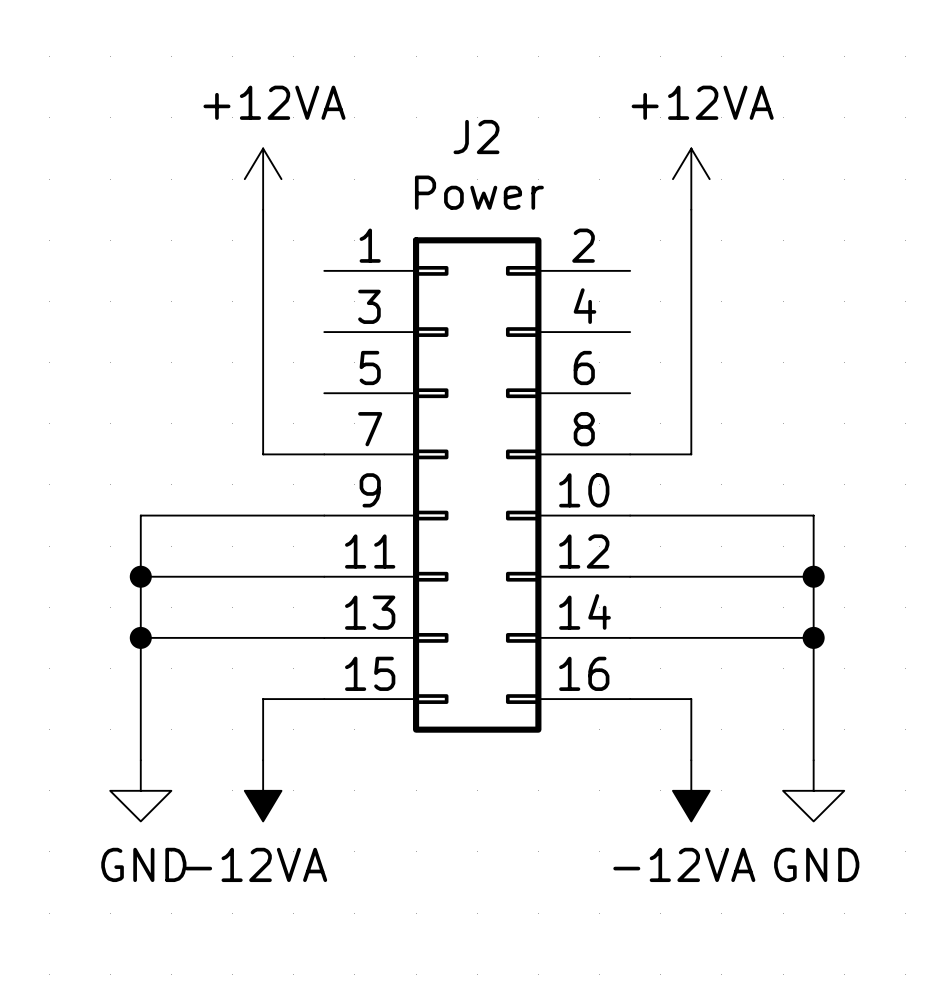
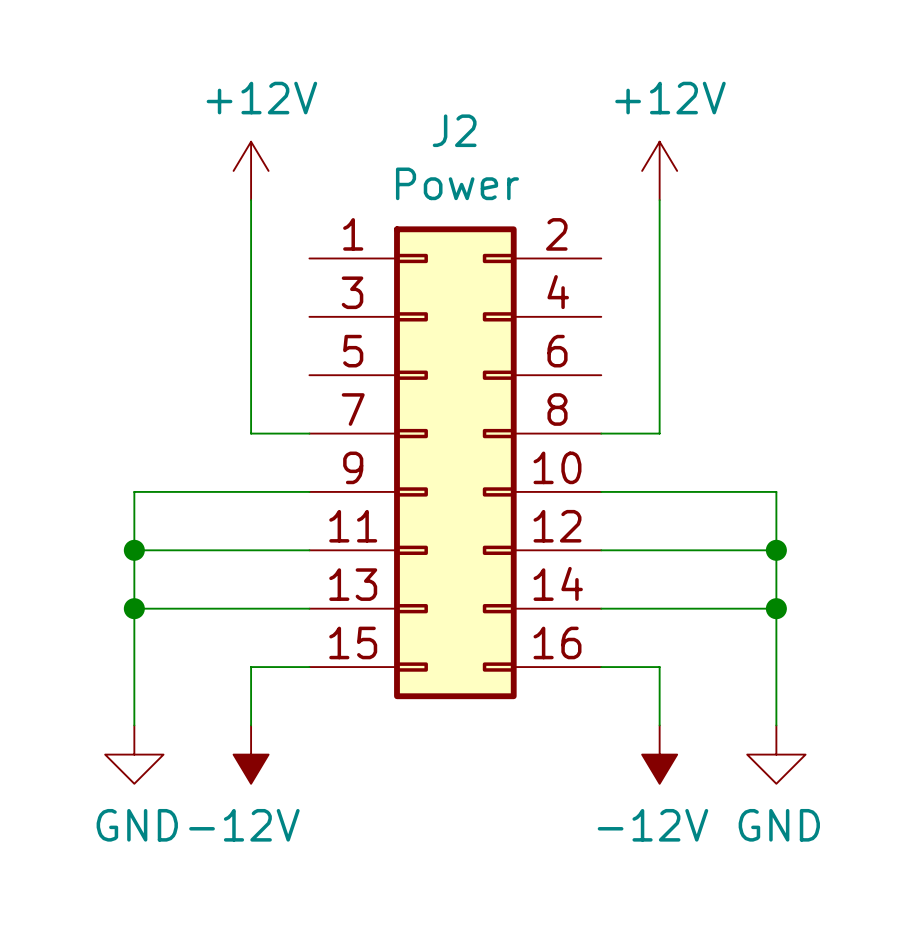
power symbol: +12VA (263, 179) -> +12V (251, 170)
power symbol: +12VA (691, 179) -> +12V (659, 170)
power symbol: -12VA (263, 790) -> -12V (251, 754)
power symbol: -12VA (691, 790) -> -12V (659, 754)

